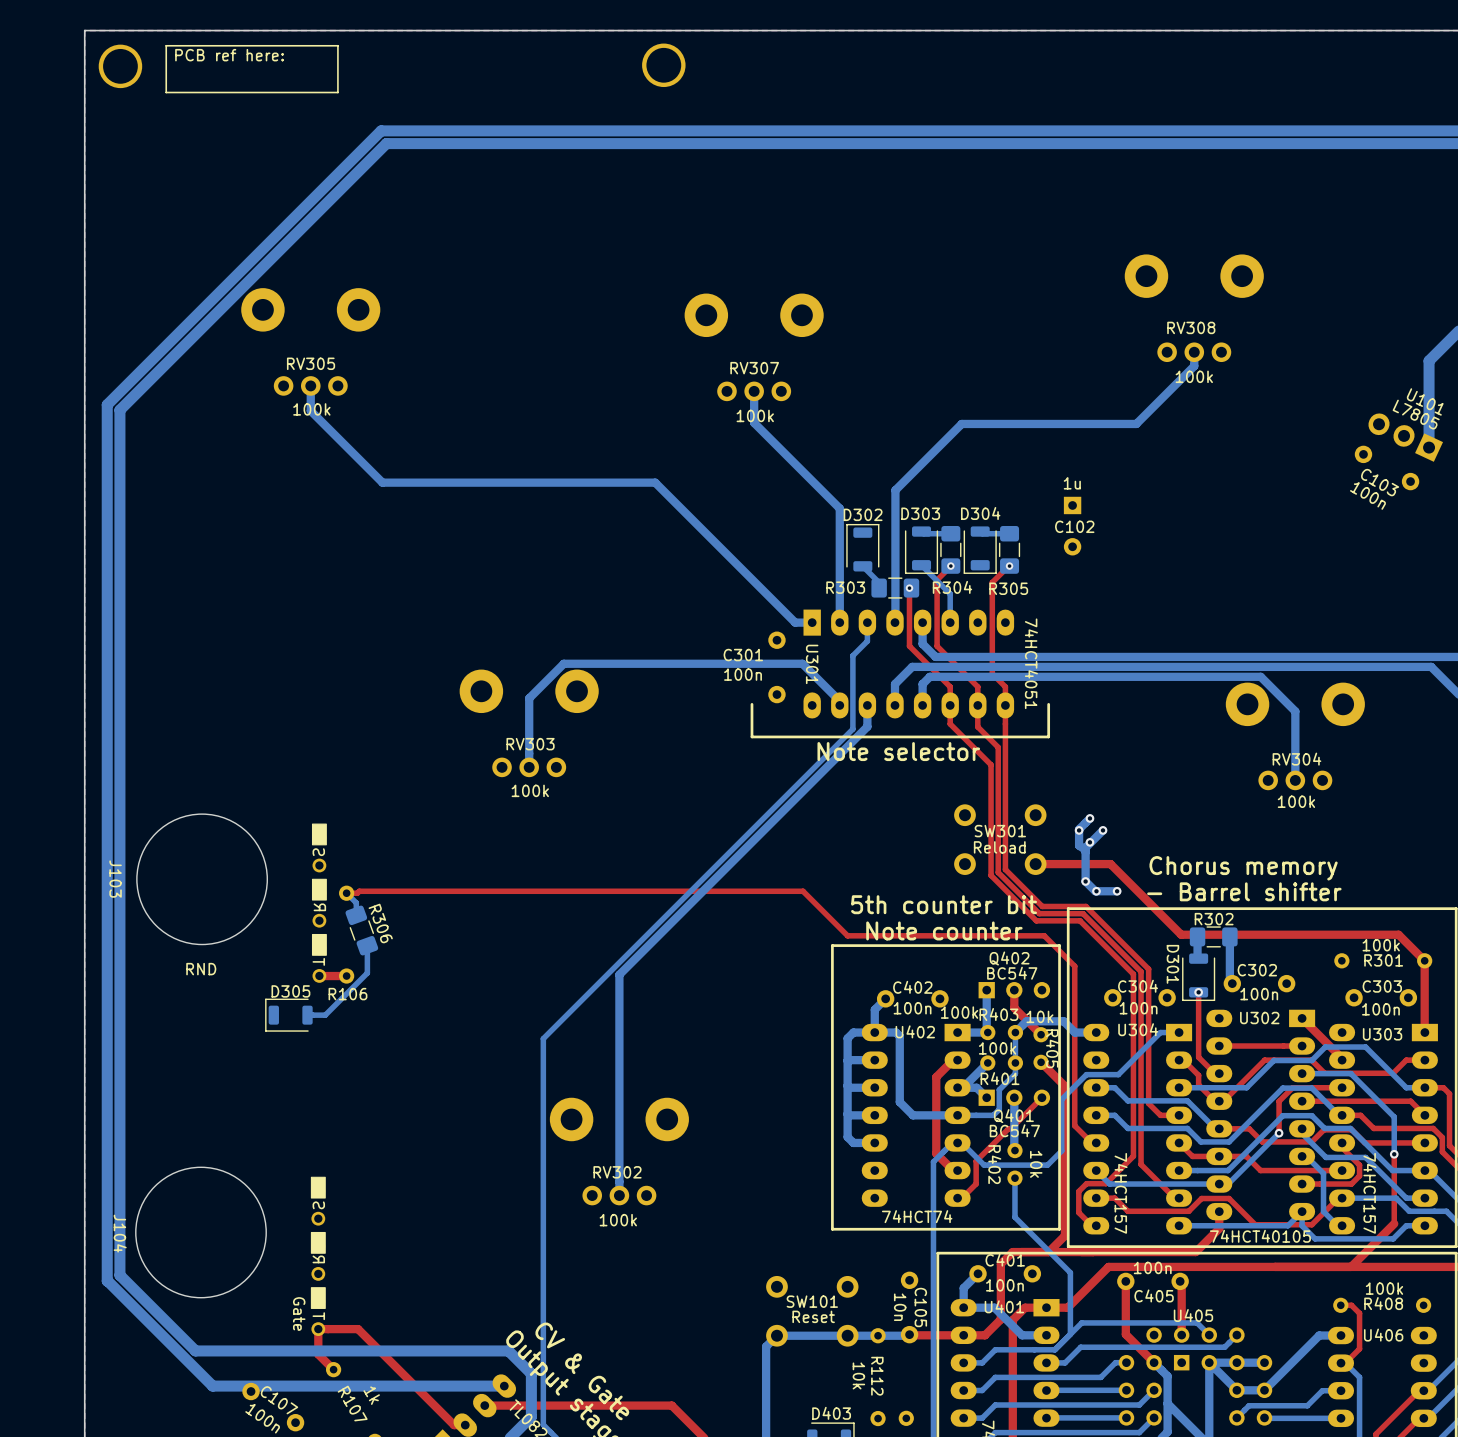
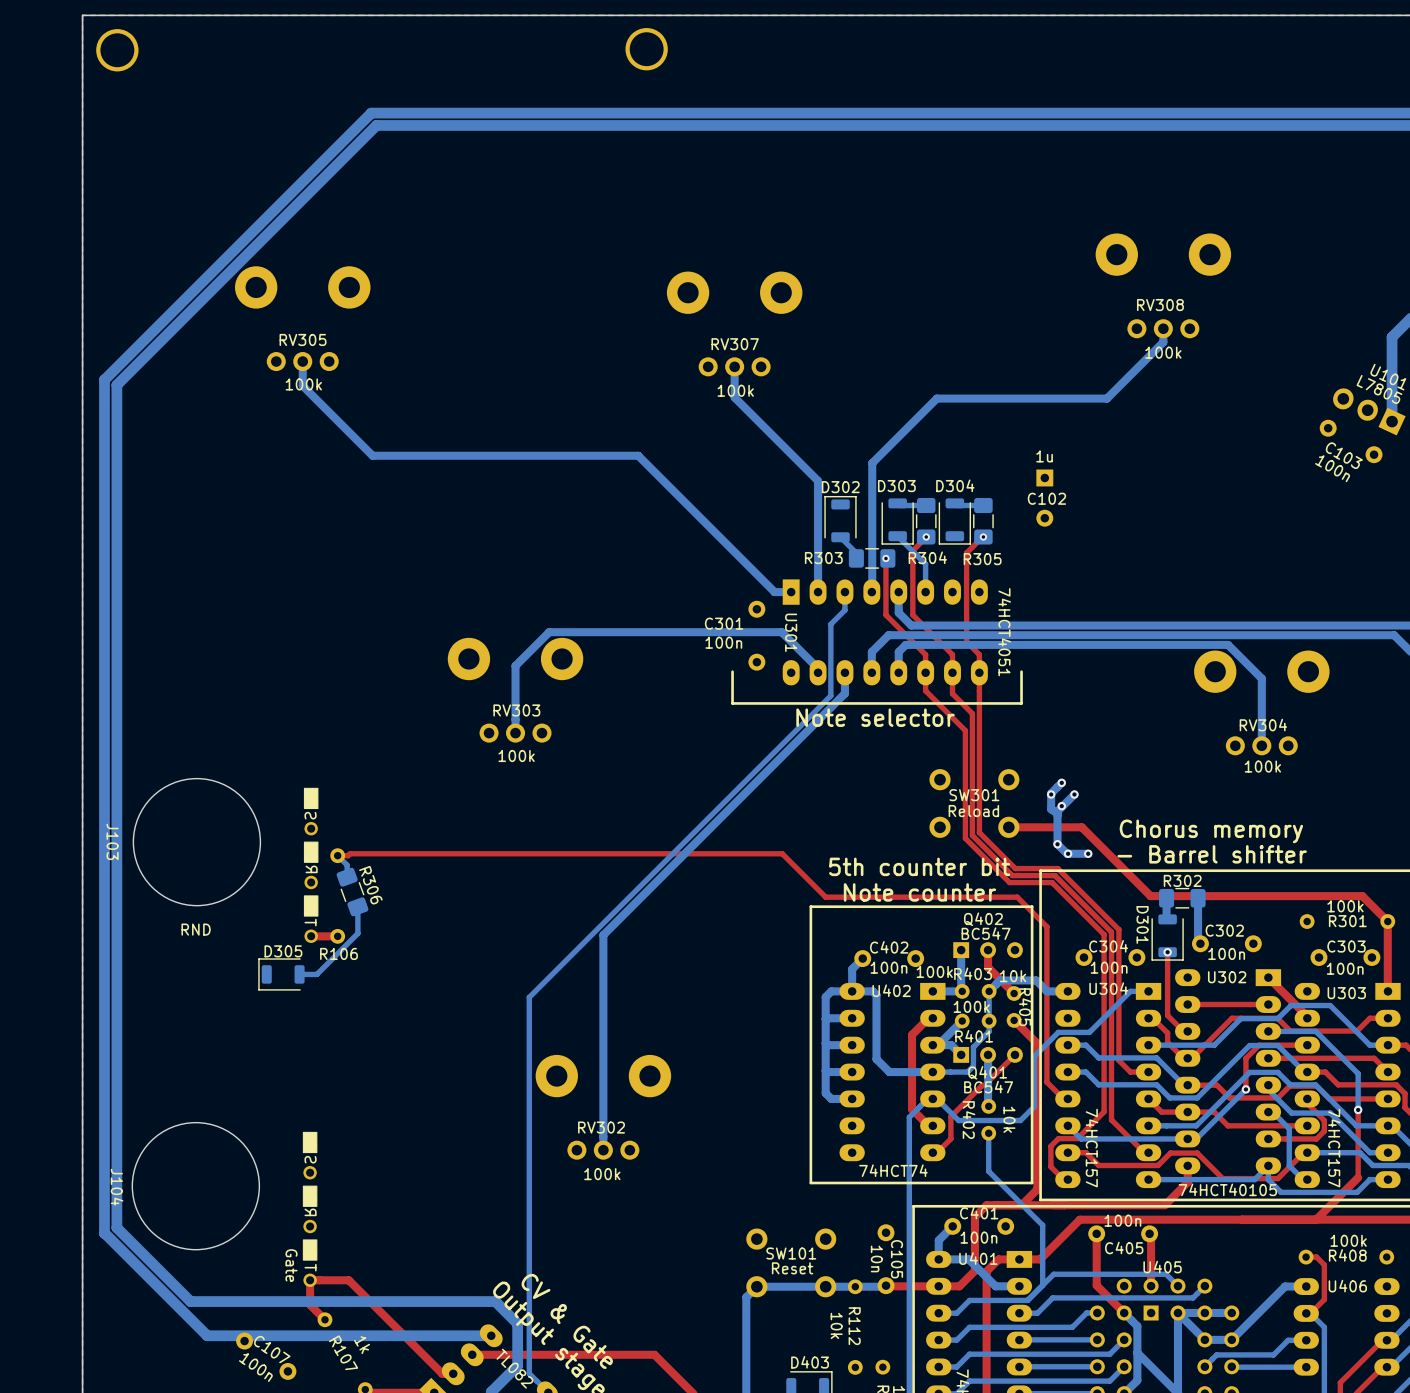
line: (337, 45) (337, 92) (166, 92) (166, 45) (337, 45) -> none
text: PCB ref here: (229, 55) -> none

